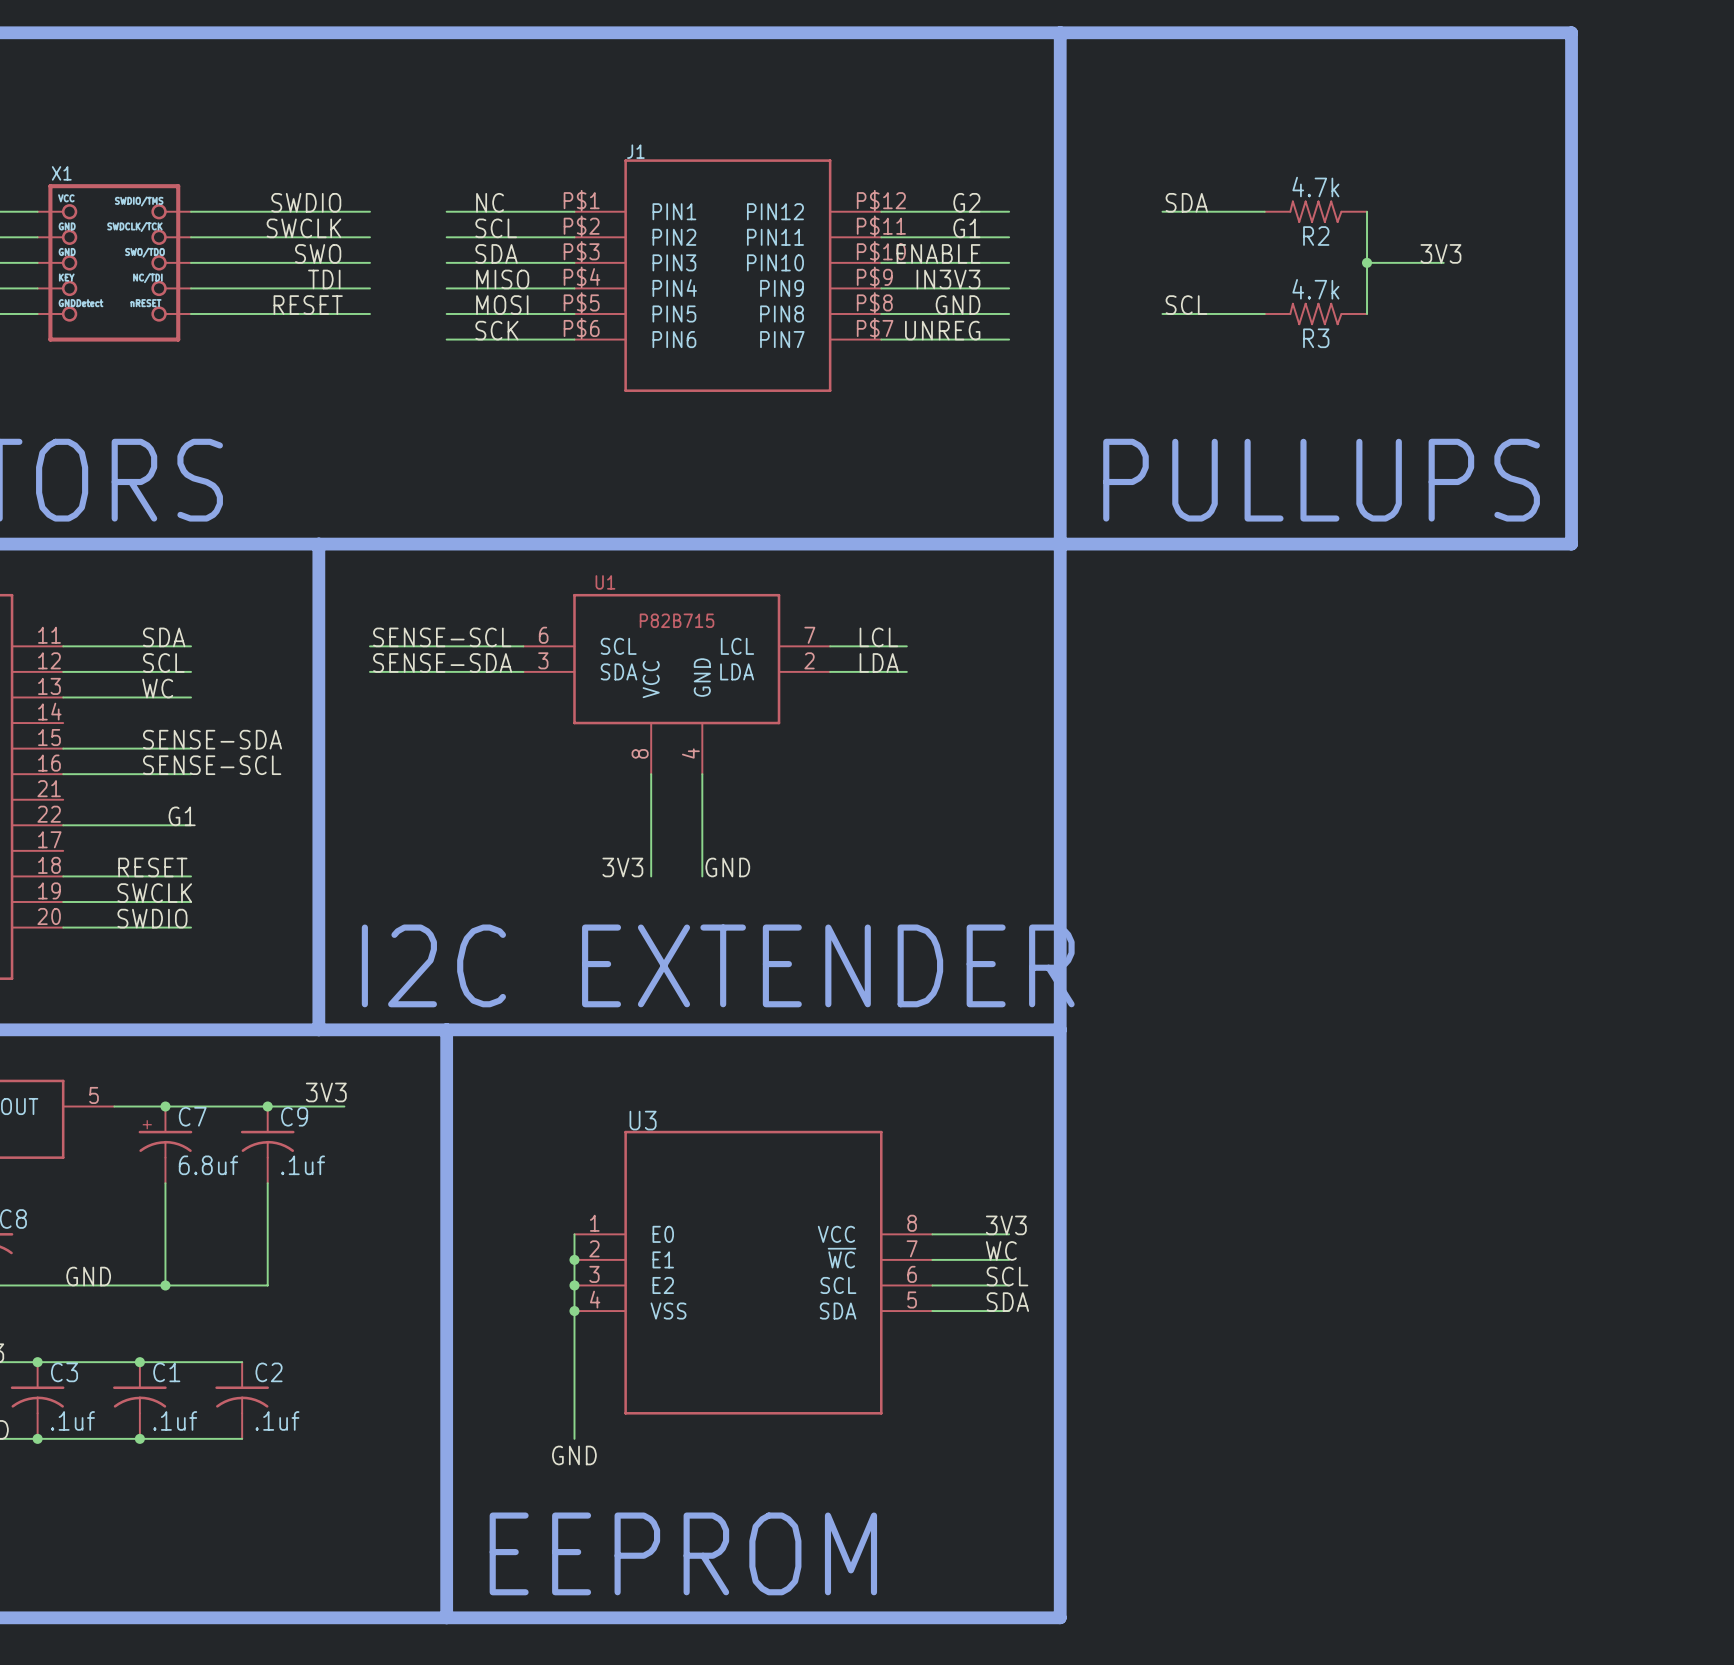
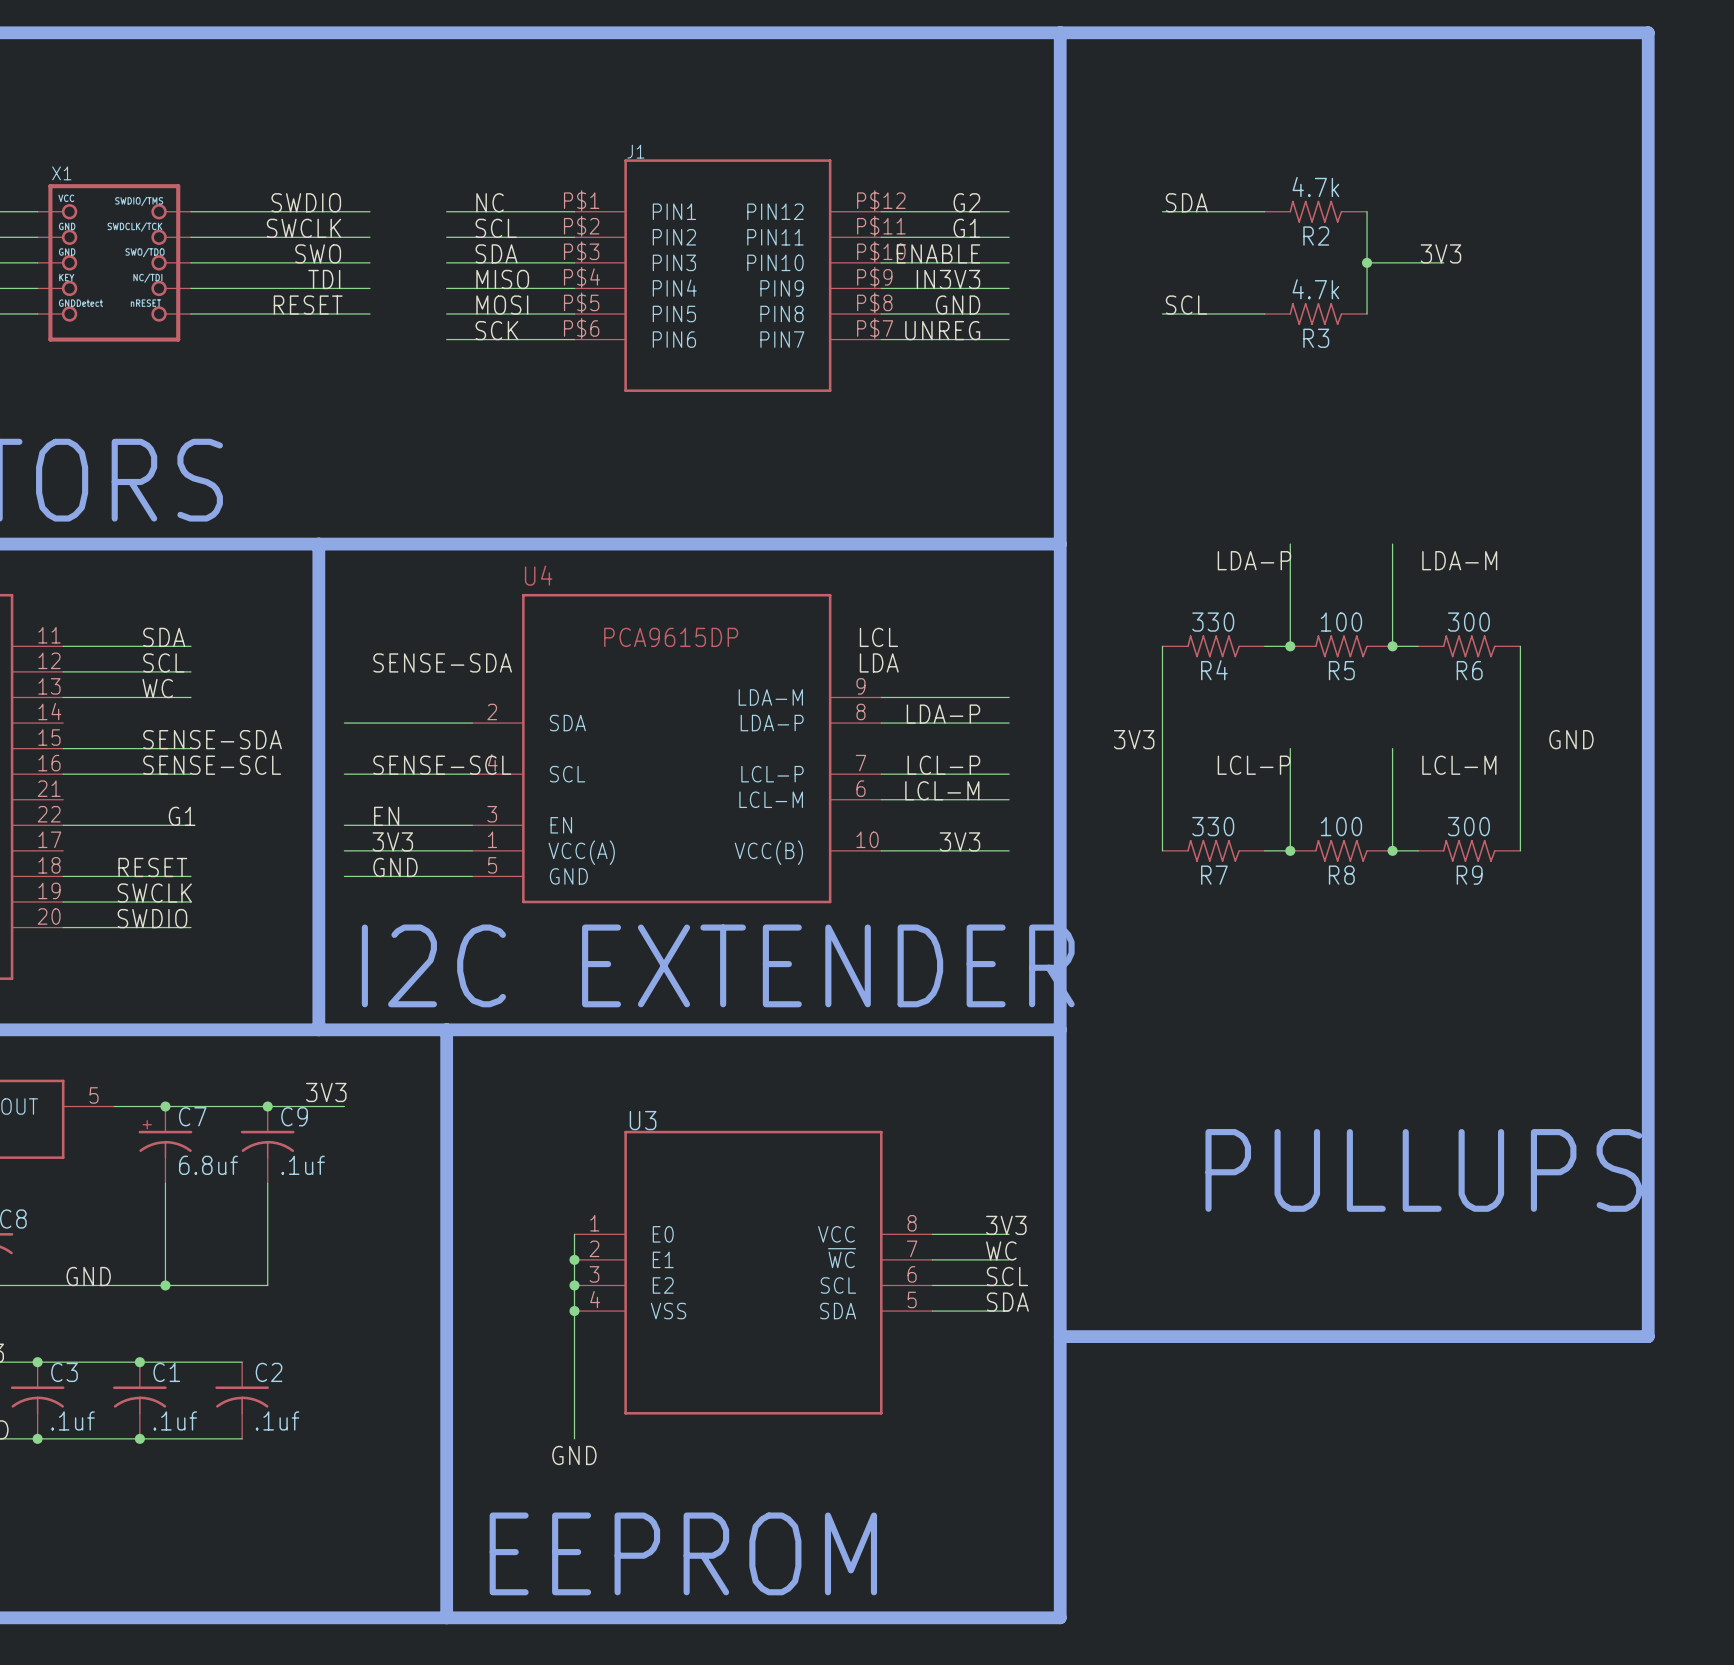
line: (1571, 32) (1571, 544) (1060, 544) -> (1571, 32) (1648, 32) (1648, 1336) (1060, 1336)
text: PULLUPS (1321, 480) -> none
wire: none -> (1290, 544) (1290, 646) (1264, 646)
wire: none -> (1392, 544) (1392, 646) (1418, 646)
label: none -> LDA-P (1254, 560)
label: none -> LDA-M (1459, 560)
label position: SENSE-SCL (442, 637) -> SENSE-SCL (442, 765)
wire: (369, 646) (523, 646) -> none
wire: (830, 646) (906, 646) -> none
wire: none -> (1162, 646) (1162, 850)
R4: none -> 330 (1213, 646)
junction: none -> (1290, 646)
R5: none -> 100 (1341, 646)
junction: none -> (1392, 646)
R6: none -> 300 (1469, 646)
wire: none -> (1520, 646) (1520, 850)
wire: (369, 671) (523, 671) -> none
wire: (830, 671) (906, 671) -> none
U1: (676, 684) -> none
wire: none -> (881, 697) (1009, 697)
label: none -> LDA-P (943, 714)
wire: none -> (344, 723) (472, 723)
wire: none -> (881, 723) (1009, 723)
label: none -> 3V3 (1134, 739)
label: none -> GND (1571, 739)
U4: none -> (676, 748)
wire: none -> (1290, 748) (1290, 850) (1264, 850)
wire: none -> (1392, 748) (1392, 850) (1418, 850)
label: none -> LCL-P (943, 765)
label: none -> LCL-P (1254, 765)
label: none -> LCL-M (1459, 765)
wire: none -> (344, 774) (472, 774)
wire: (651, 774) (651, 876) -> none
wire: (702, 774) (702, 876) -> none
wire: none -> (881, 774) (1009, 774)
label: none -> LCL-M (942, 790)
wire: none -> (881, 799) (1009, 799)
label: none -> EN (386, 816)
wire: none -> (344, 825) (472, 825)
label: none -> 3V3 (392, 841)
label: none -> 3V3 (959, 841)
wire: none -> (344, 850) (472, 850)
wire: none -> (881, 850) (1009, 850)
R7: none -> 330 (1213, 850)
junction: none -> (1290, 850)
R8: none -> 100 (1341, 850)
junction: none -> (1392, 850)
R9: none -> 300 (1469, 850)
label: none -> GND (395, 867)
label: 3V3 (622, 867) -> none
label: GND (727, 867) -> none
wire: none -> (344, 876) (472, 876)
text: none -> PULLUPS (1423, 1170)

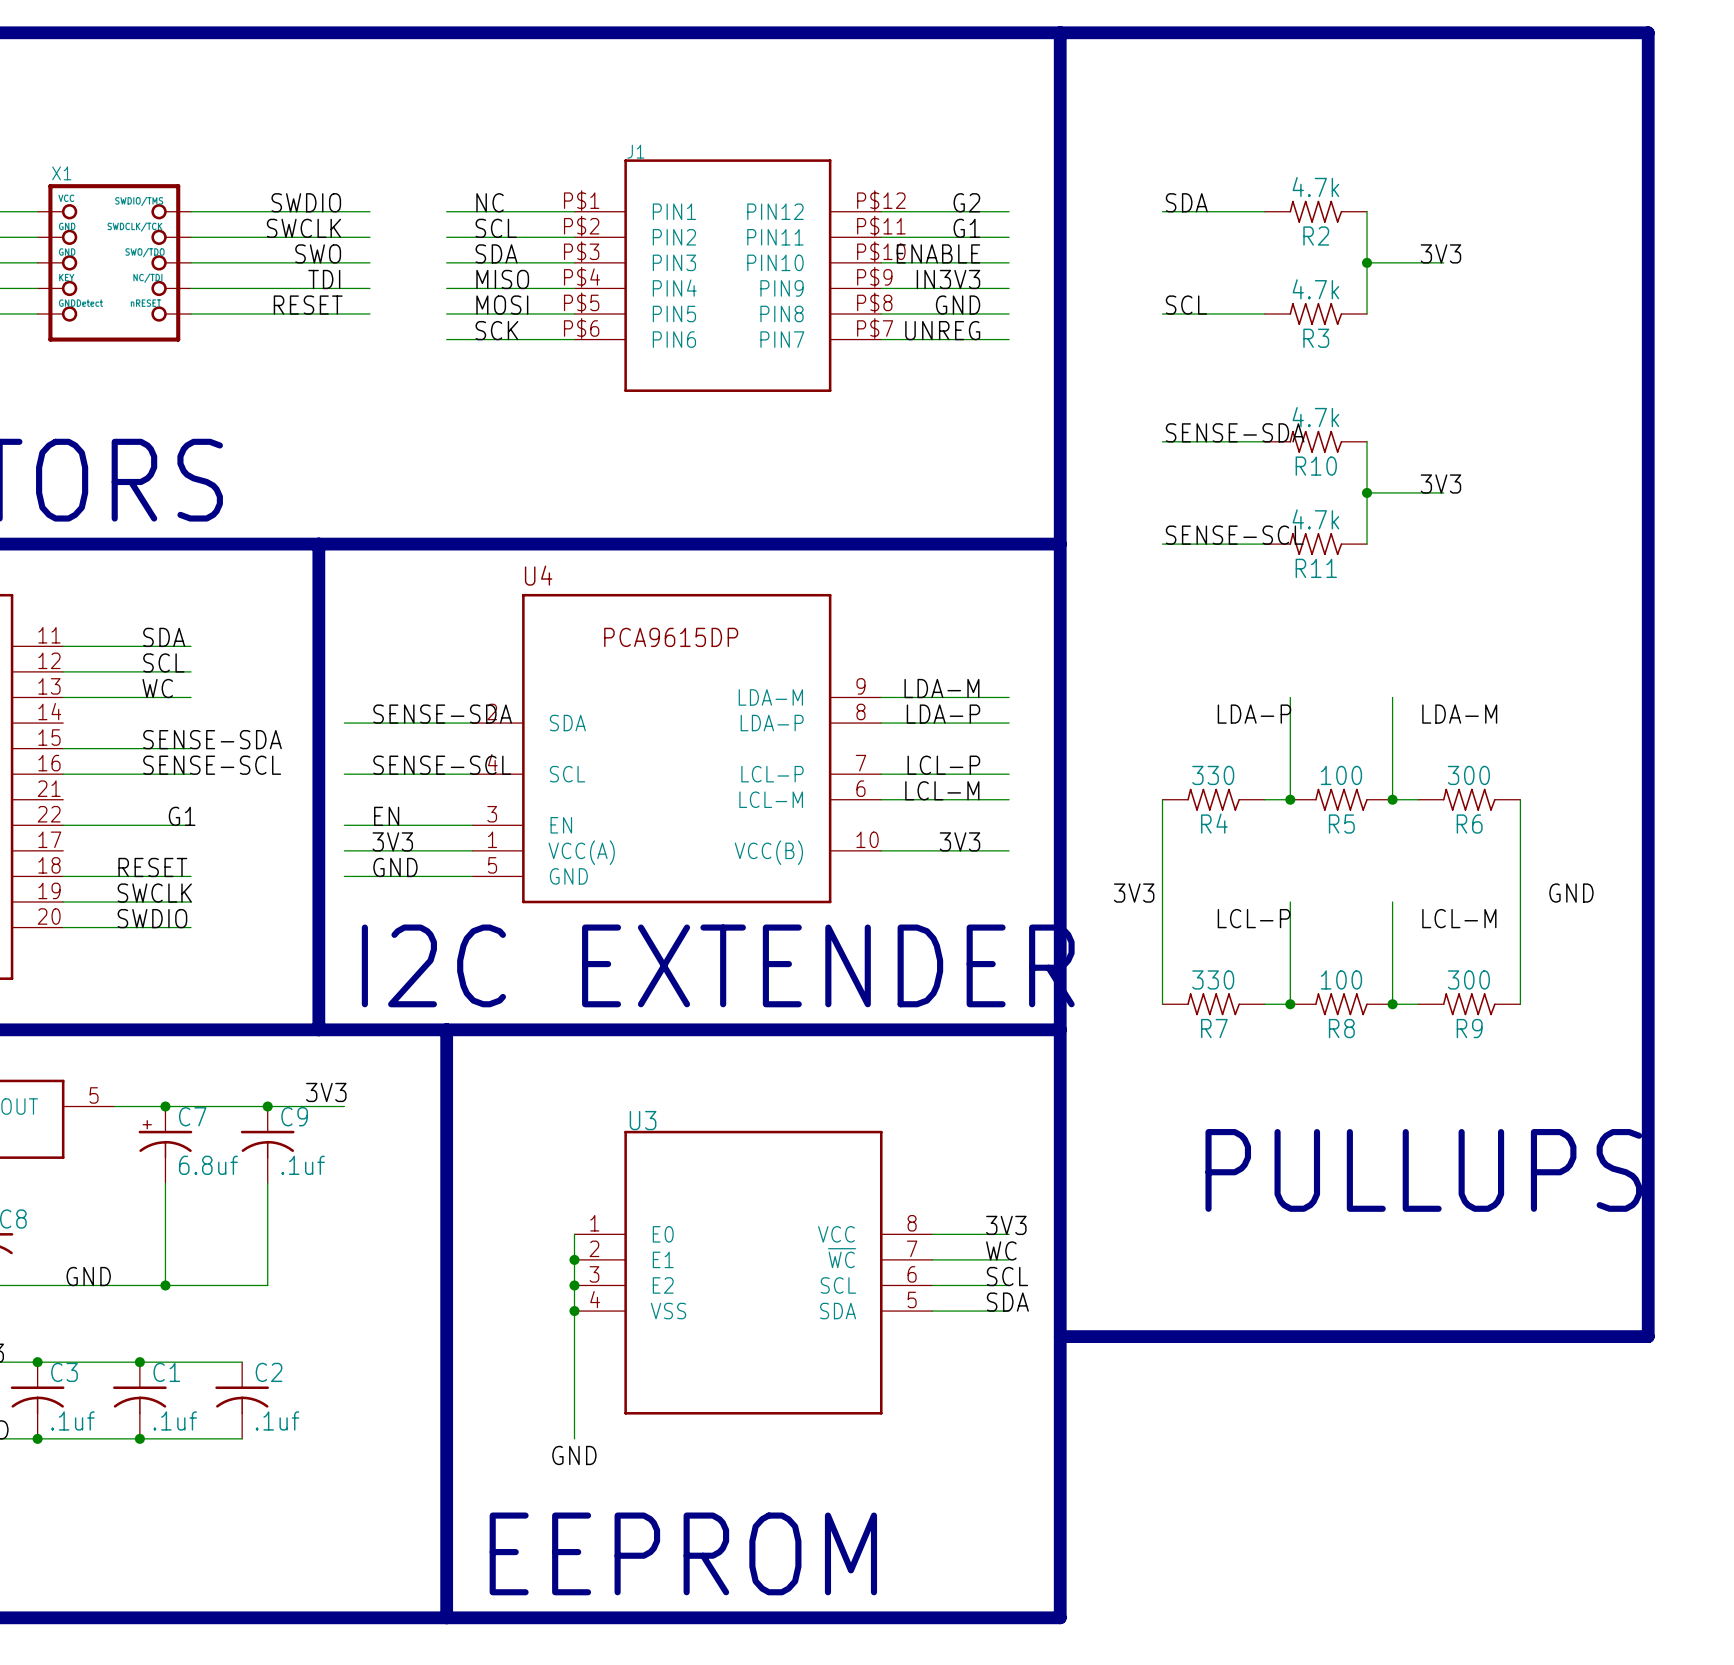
label: none -> SENSE-SDA (1235, 432)
wire: none -> (1162, 441) (1264, 441)
R10: none -> 4.7k (1315, 441)
wire: none -> (1367, 441) (1367, 544)
label: none -> 3V3 (1440, 484)
wire: none -> (1367, 492) (1443, 492)
junction: none -> (1367, 492)
label: none -> SENSE-SCL (1234, 535)
wire: none -> (1162, 544) (1264, 544)
wire: (1290, 544) (1290, 646) (1264, 646) -> none
R11: none -> 4.7k (1315, 544)
wire: (1392, 544) (1392, 646) (1418, 646) -> none
label position: LDA-P (1254, 560) -> LDA-P (1254, 714)
label position: LDA-M (1459, 560) -> LDA-M (1459, 714)
label: LCL (878, 637) -> none
wire: (1162, 646) (1162, 799) -> (1162, 850) (1162, 1004)
R4 position: (1213, 646) -> (1213, 799)
junction: (1290, 646) -> none
R5 position: (1341, 646) -> (1341, 799)
junction: (1392, 646) -> none
R6 position: (1469, 646) -> (1469, 799)
wire: (1520, 646) (1520, 799) -> (1520, 850) (1520, 1004)
label position: SENSE-SDA (442, 662) -> SENSE-SDA (442, 714)
label: LDA (879, 662) -> LDA-M (941, 688)
wire: none -> (1290, 697) (1290, 748)
wire: none -> (1392, 697) (1392, 748)
label position: 3V3 (1134, 739) -> 3V3 (1134, 893)
label position: GND (1571, 739) -> GND (1571, 893)
label position: LCL-P (1254, 765) -> LCL-P (1254, 918)
label position: LCL-M (1459, 765) -> LCL-M (1459, 918)
wire: (1290, 799) (1290, 850) (1264, 850) -> (1290, 799) (1264, 799)
wire: (1392, 799) (1392, 850) (1418, 850) -> (1392, 799) (1418, 799)
R7 position: (1213, 850) -> (1213, 1004)
junction position: (1290, 850) -> (1290, 799)
R8 position: (1341, 850) -> (1341, 1004)
junction position: (1392, 850) -> (1392, 799)
R9 position: (1469, 850) -> (1469, 1004)
wire: none -> (1290, 901) (1290, 1004) (1264, 1004)
wire: none -> (1392, 901) (1392, 1004) (1418, 1004)
junction: none -> (1290, 1004)
junction: none -> (1392, 1004)

